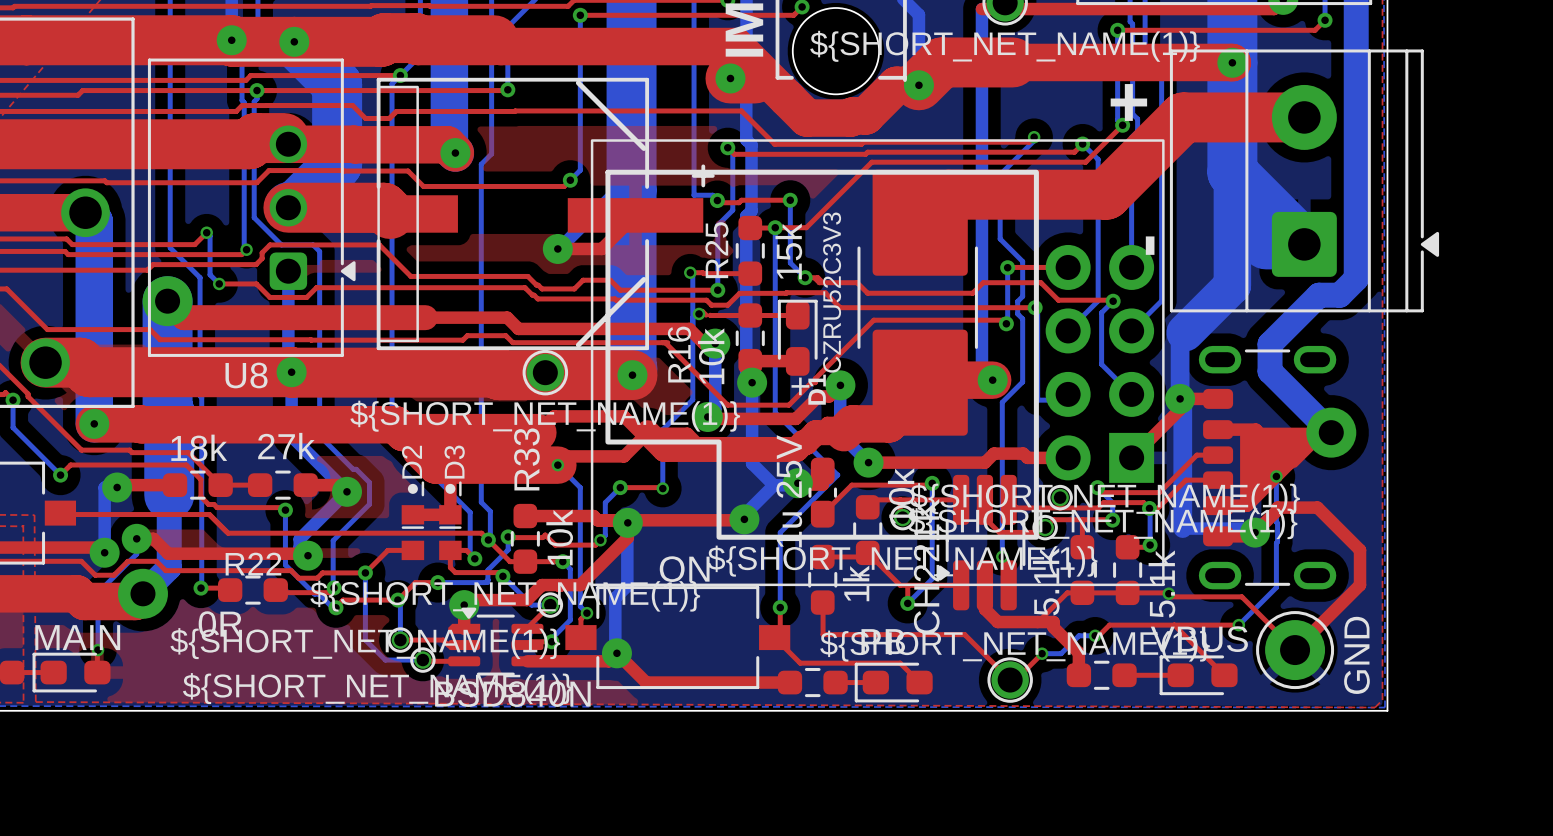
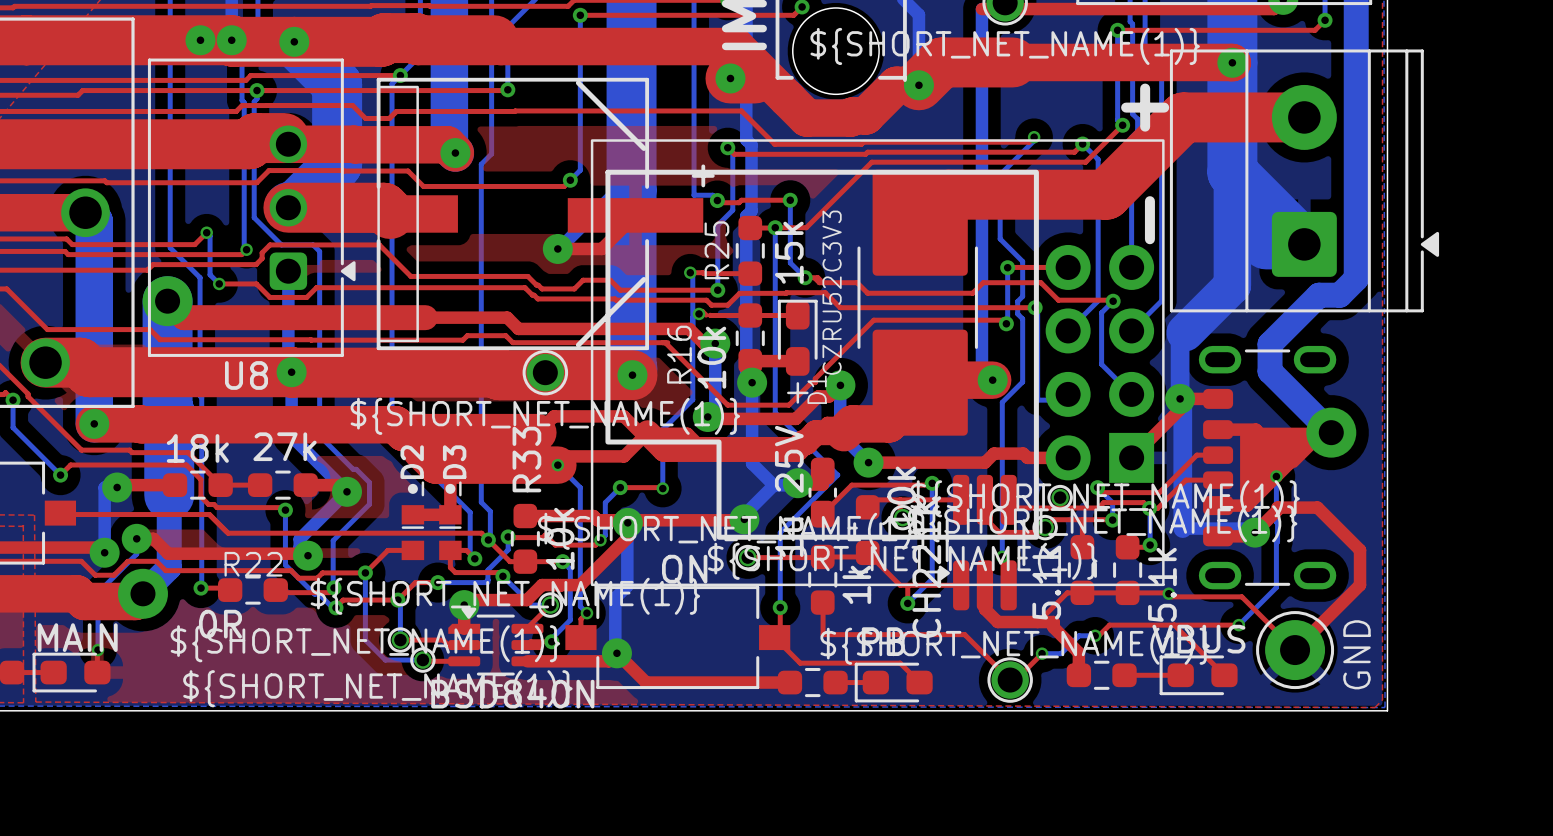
via: none -> (200, 40)
top track: none -> (822, 556) (747, 557)
part: none -> (747, 557)

